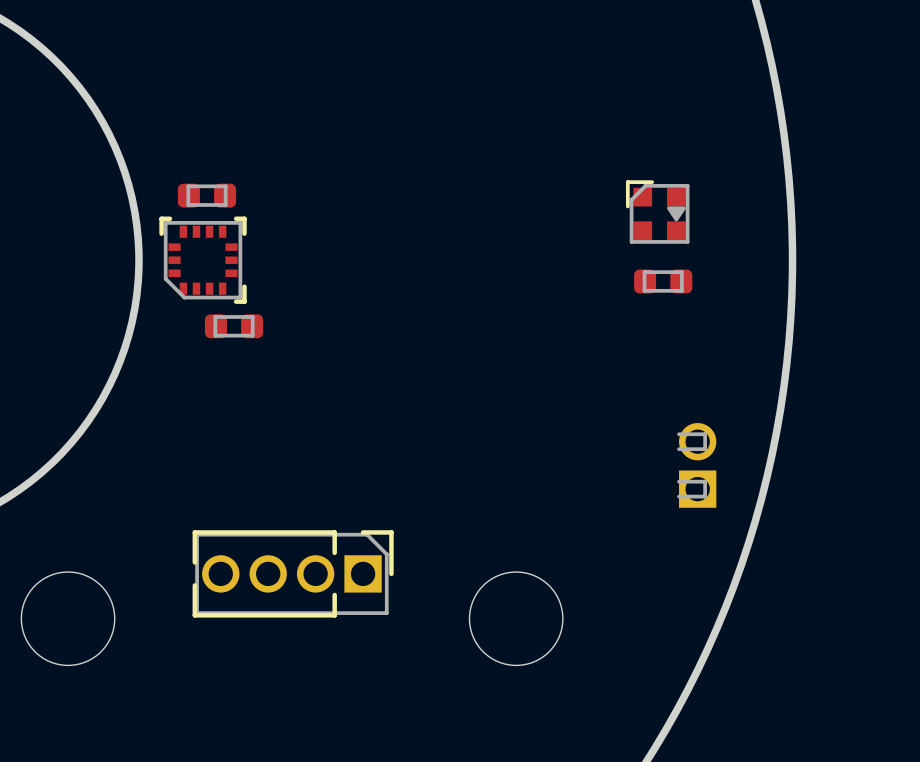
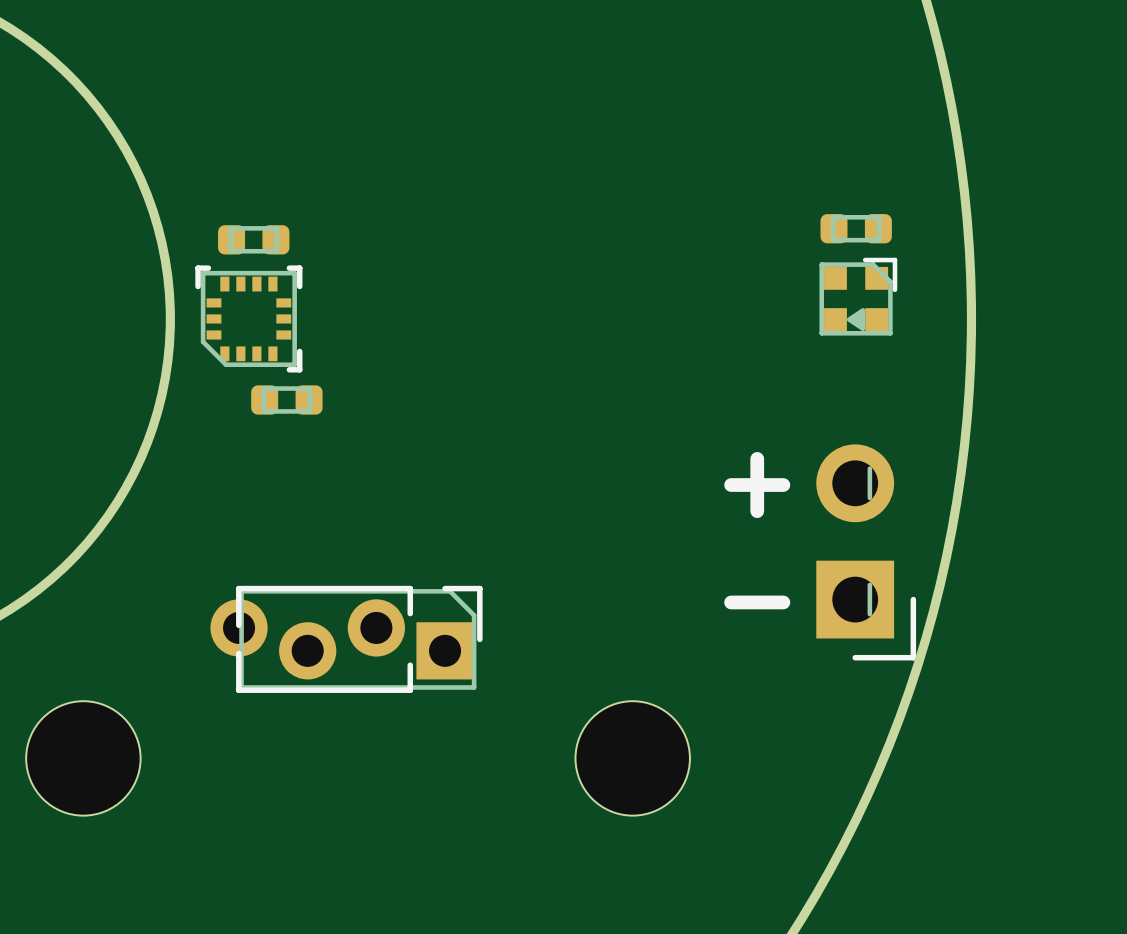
part rotation: 0° (657, 212) -> 90° clockwise (858, 296)
part position: (657, 212) -> (858, 296)
part position: (663, 281) -> (856, 228)
text: none -> + (757, 485)
part footprint: [677, 423, 717, 508] -> [816, 444, 917, 661]
text: none -> - (757, 602)
part: none -> (346, 639)
part: (293, 573) -> none

